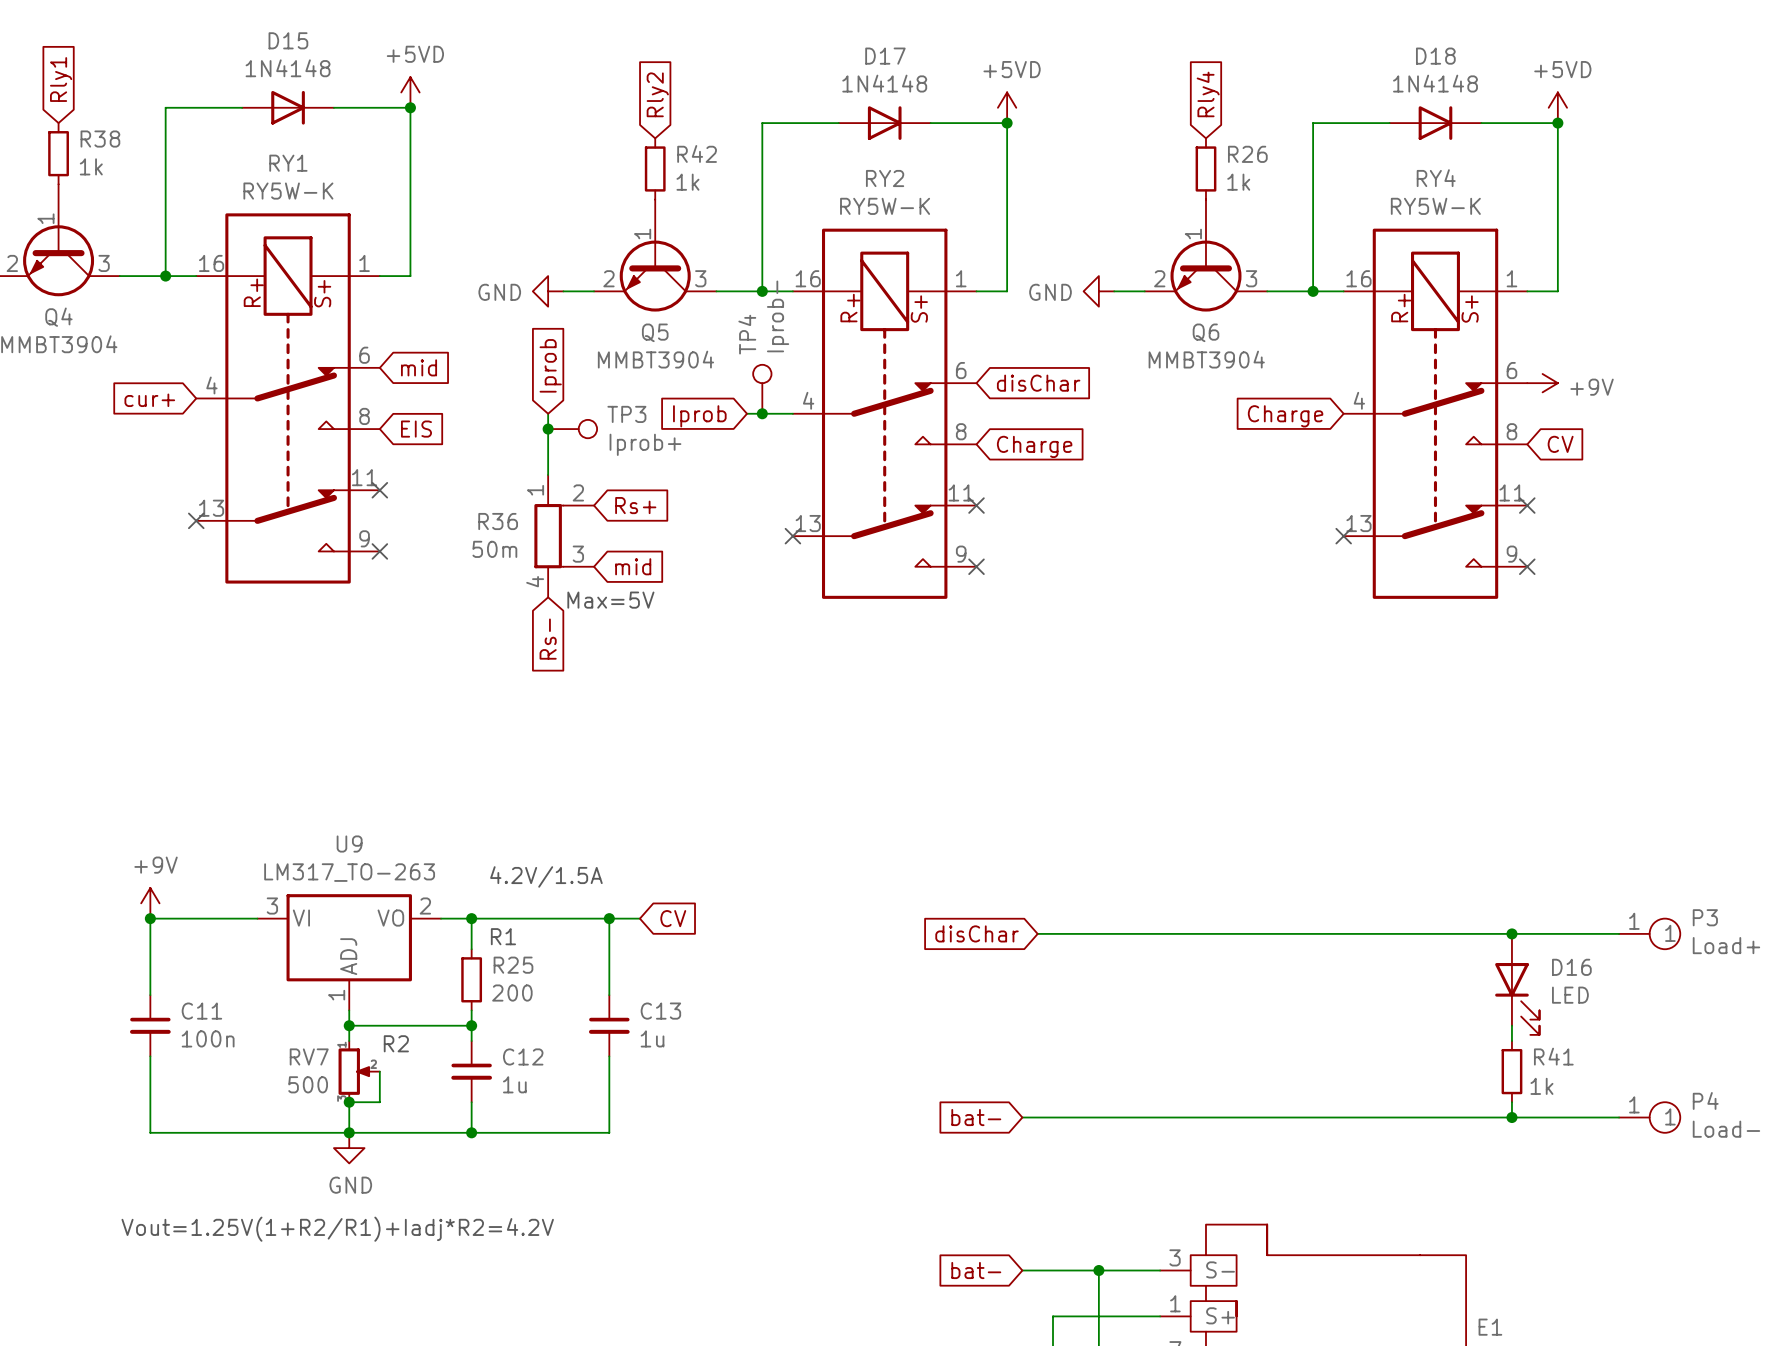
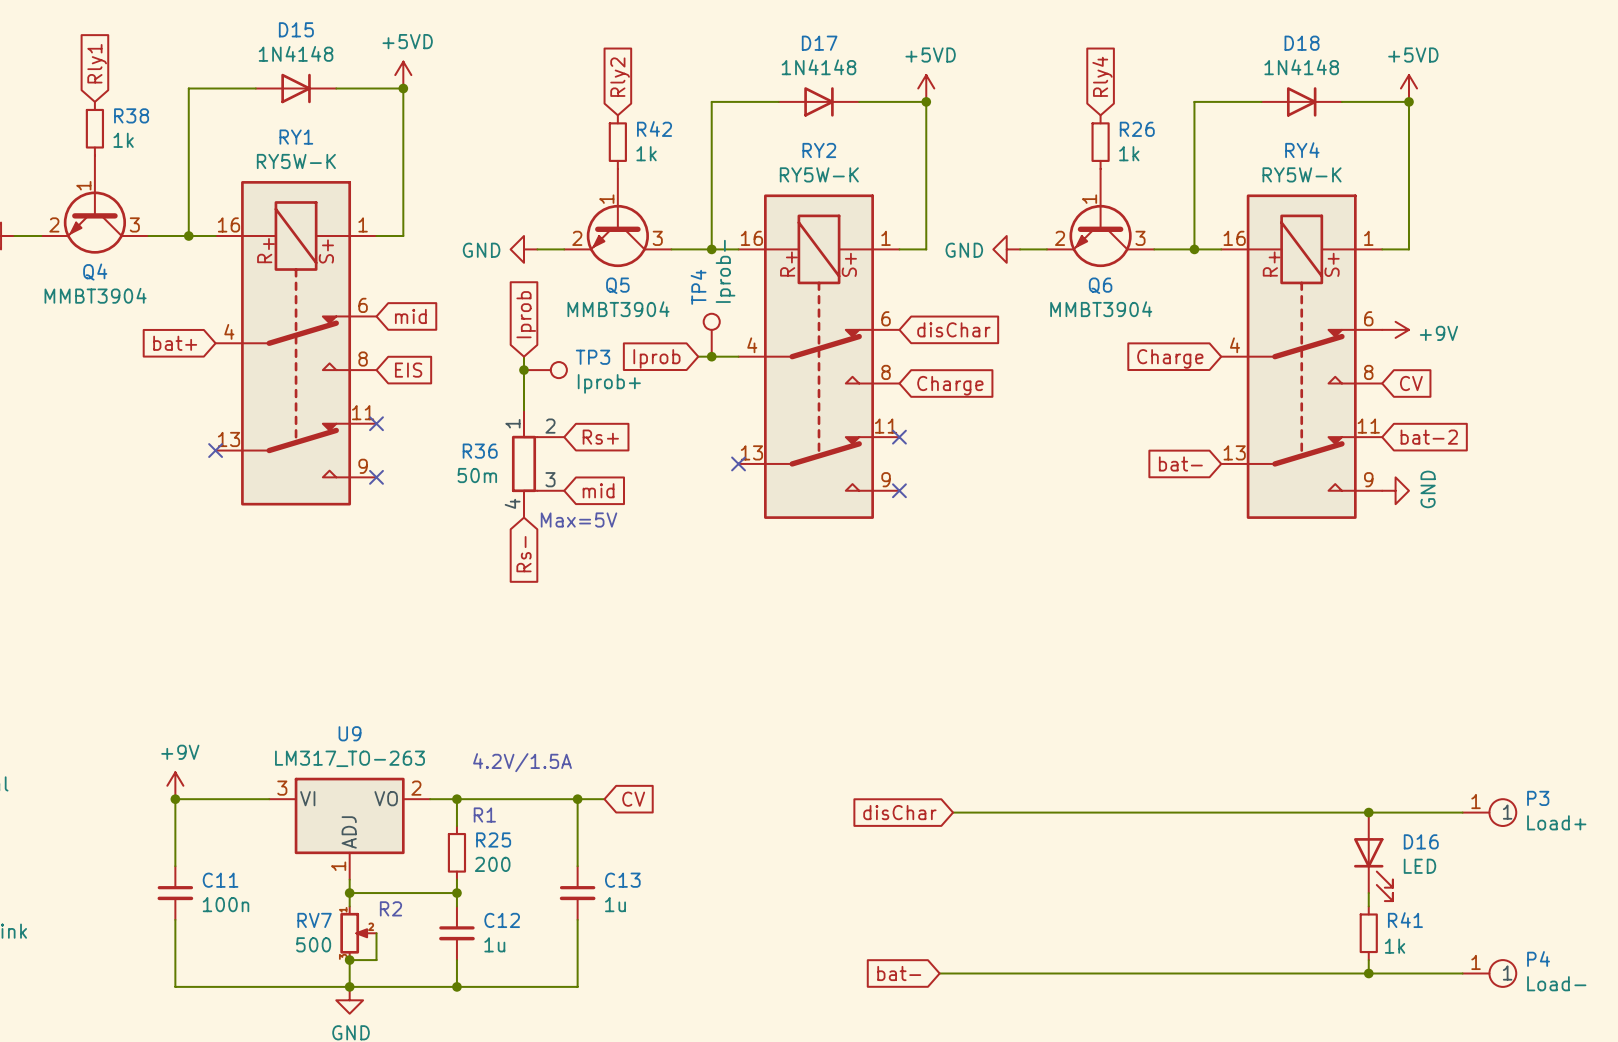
global label: cur+ (149, 400) -> bat+ (175, 343)
no-connect mark: (1527, 505) -> none
global label: none -> bat-2 (1429, 437)
global label: none -> bat- (1180, 463)
no-connect mark: (1343, 536) -> none
no-connect mark: (1527, 566) -> none
power symbol: none -> GND (1395, 490)

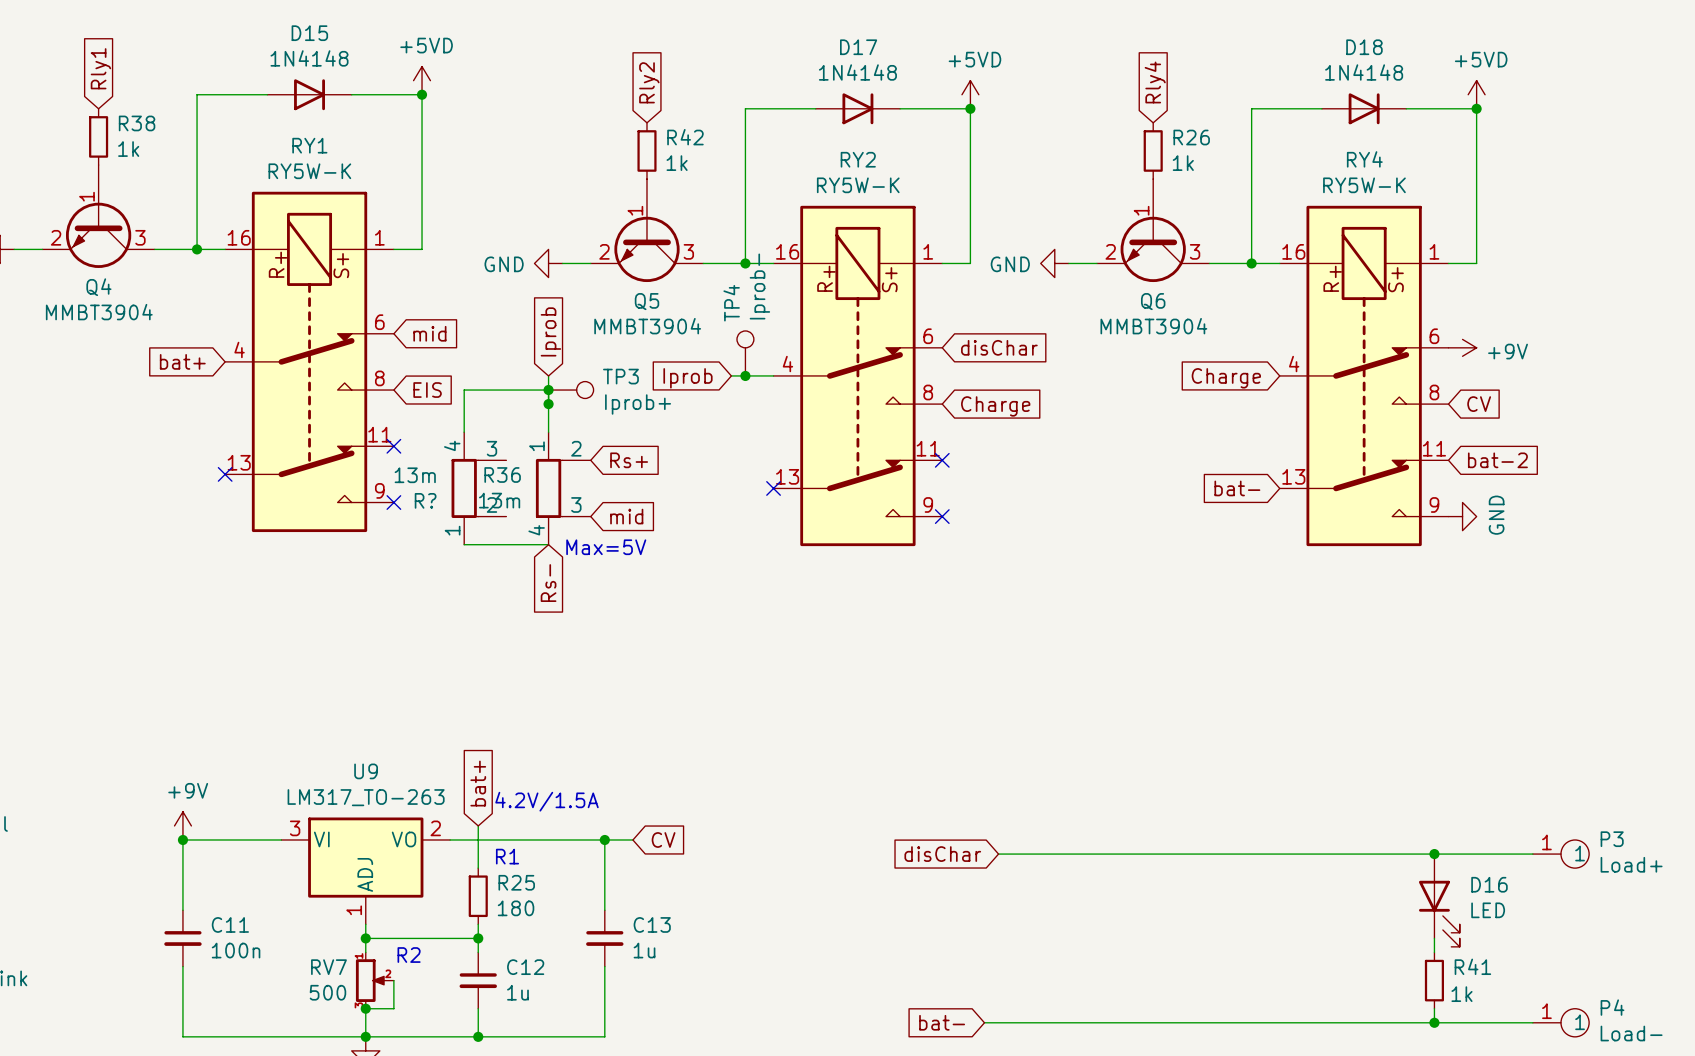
wire: none -> (548, 390) (464, 390) (464, 432)
junction: none -> (548, 404)
R?: none -> 13m (478, 488)
R36 value: 50m (477, 475) -> 13m (499, 500)
wire: none -> (464, 544) (548, 544)
global label: none -> bat+ (478, 783)
wire: none -> (478, 825) (478, 839)
junction: (456, 799) -> none
R25 value: 200 (492, 864) -> 180 (516, 908)

